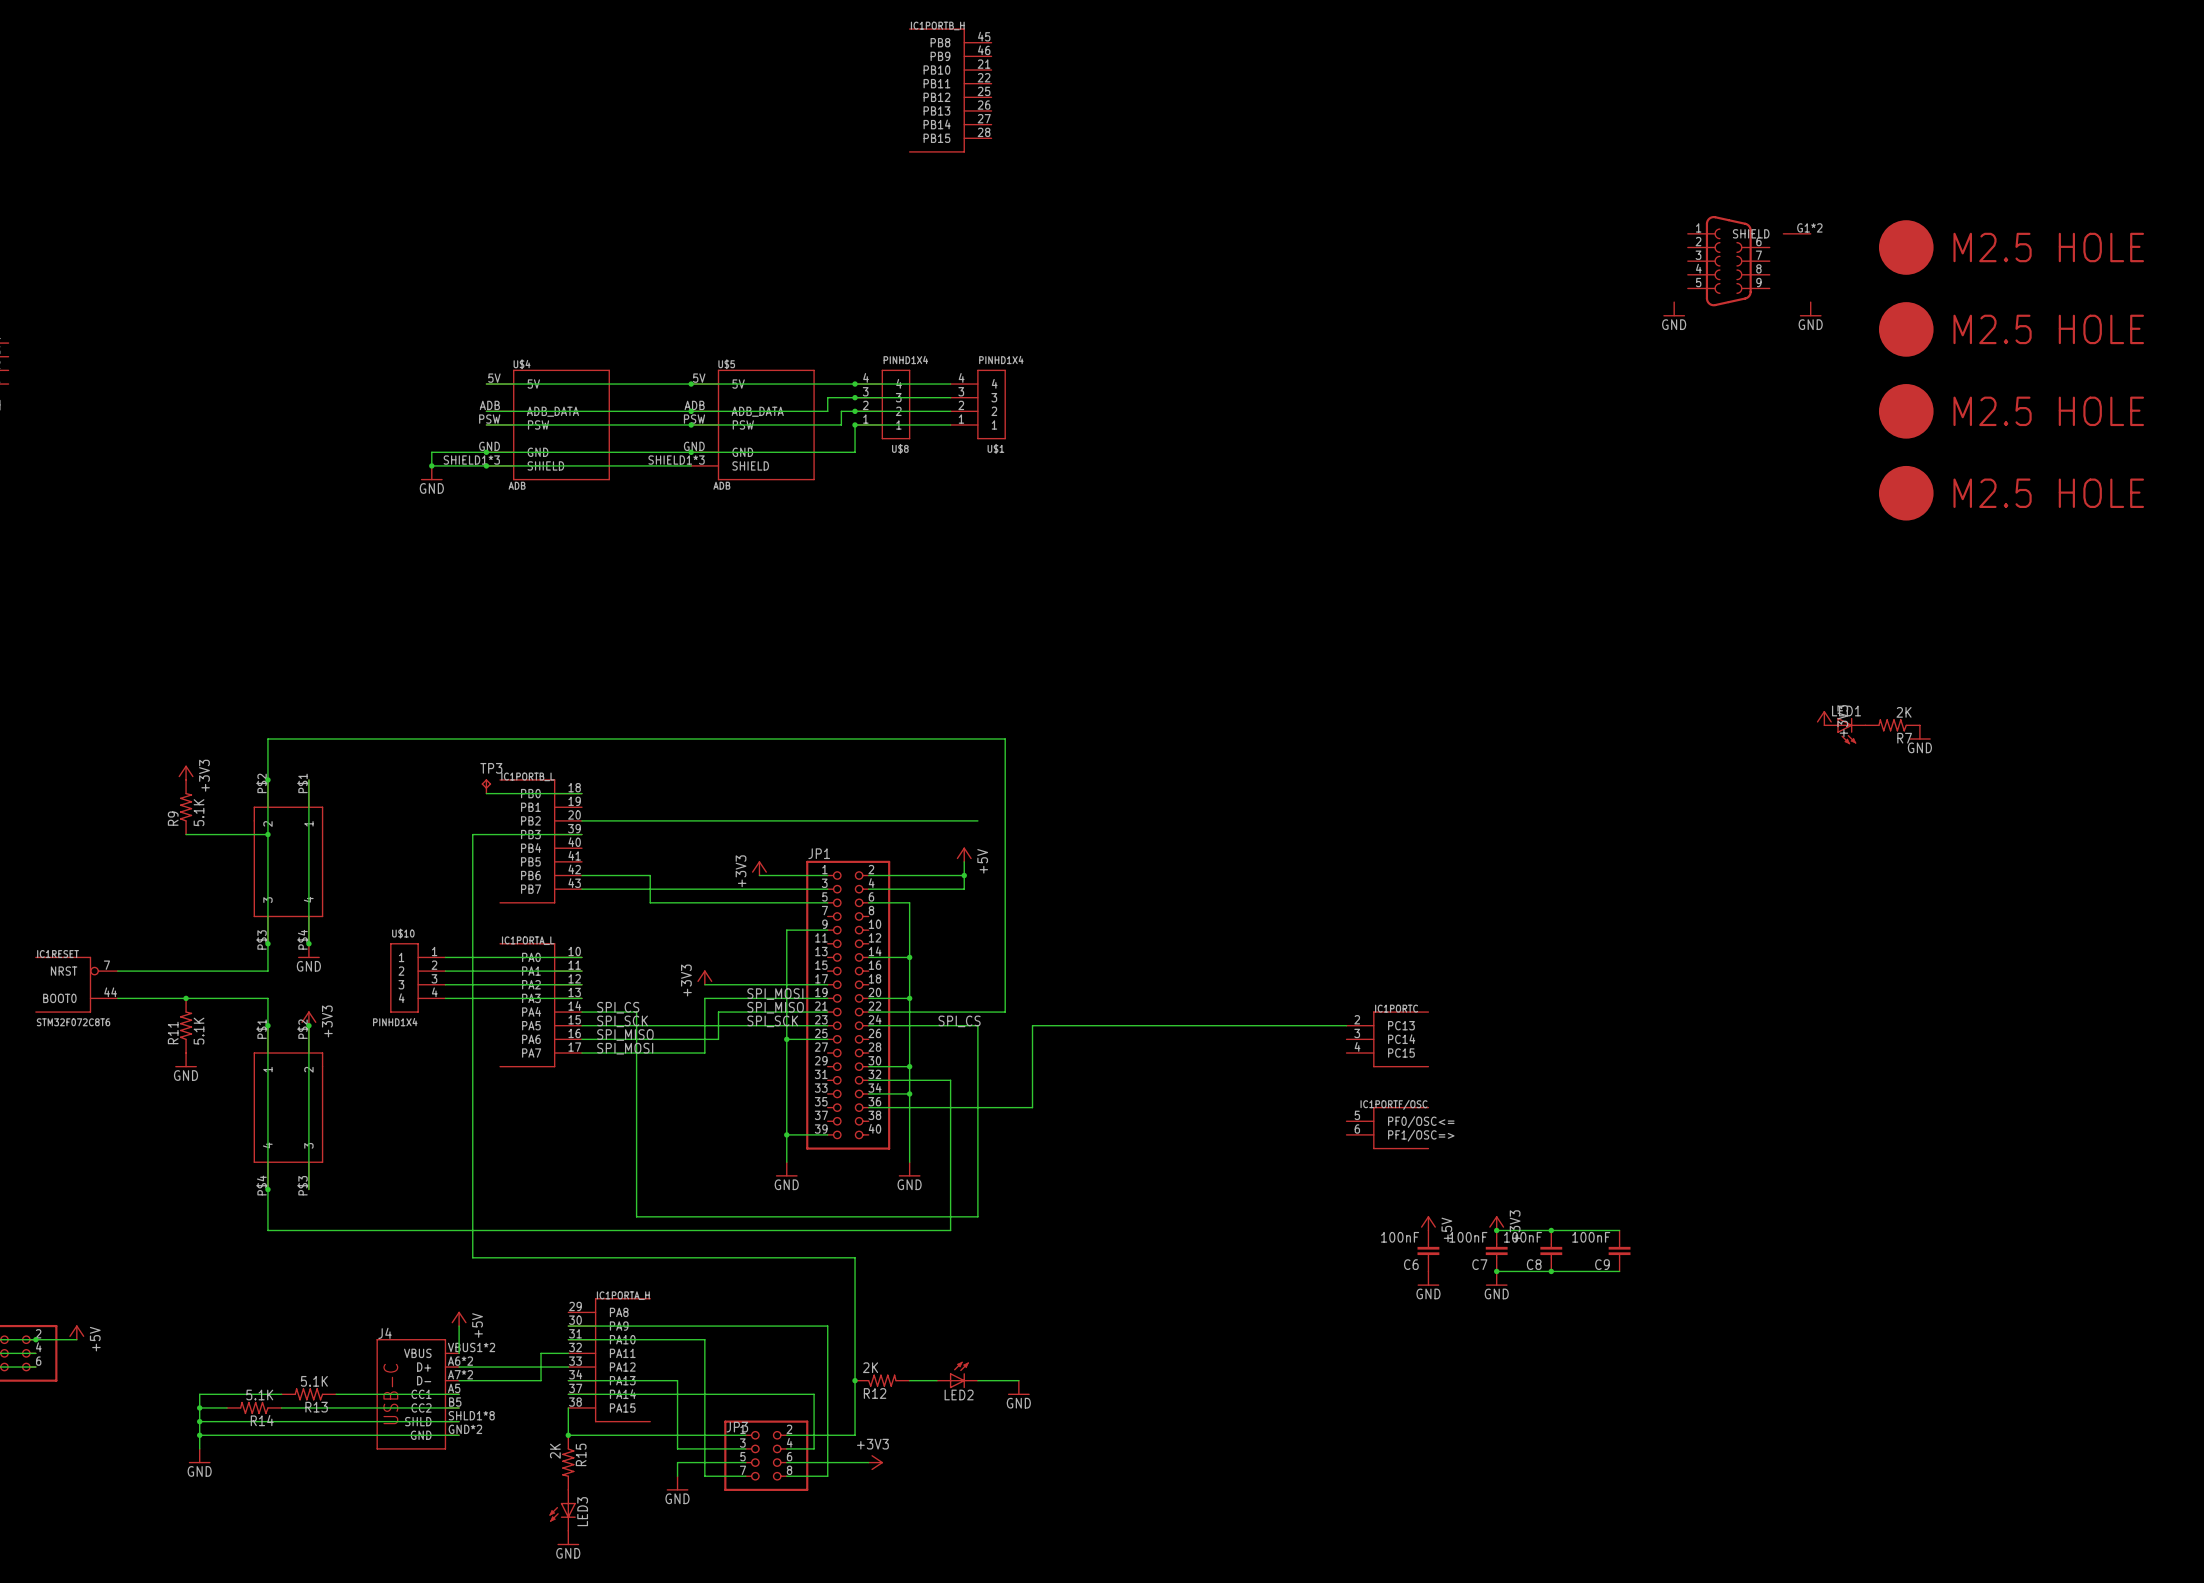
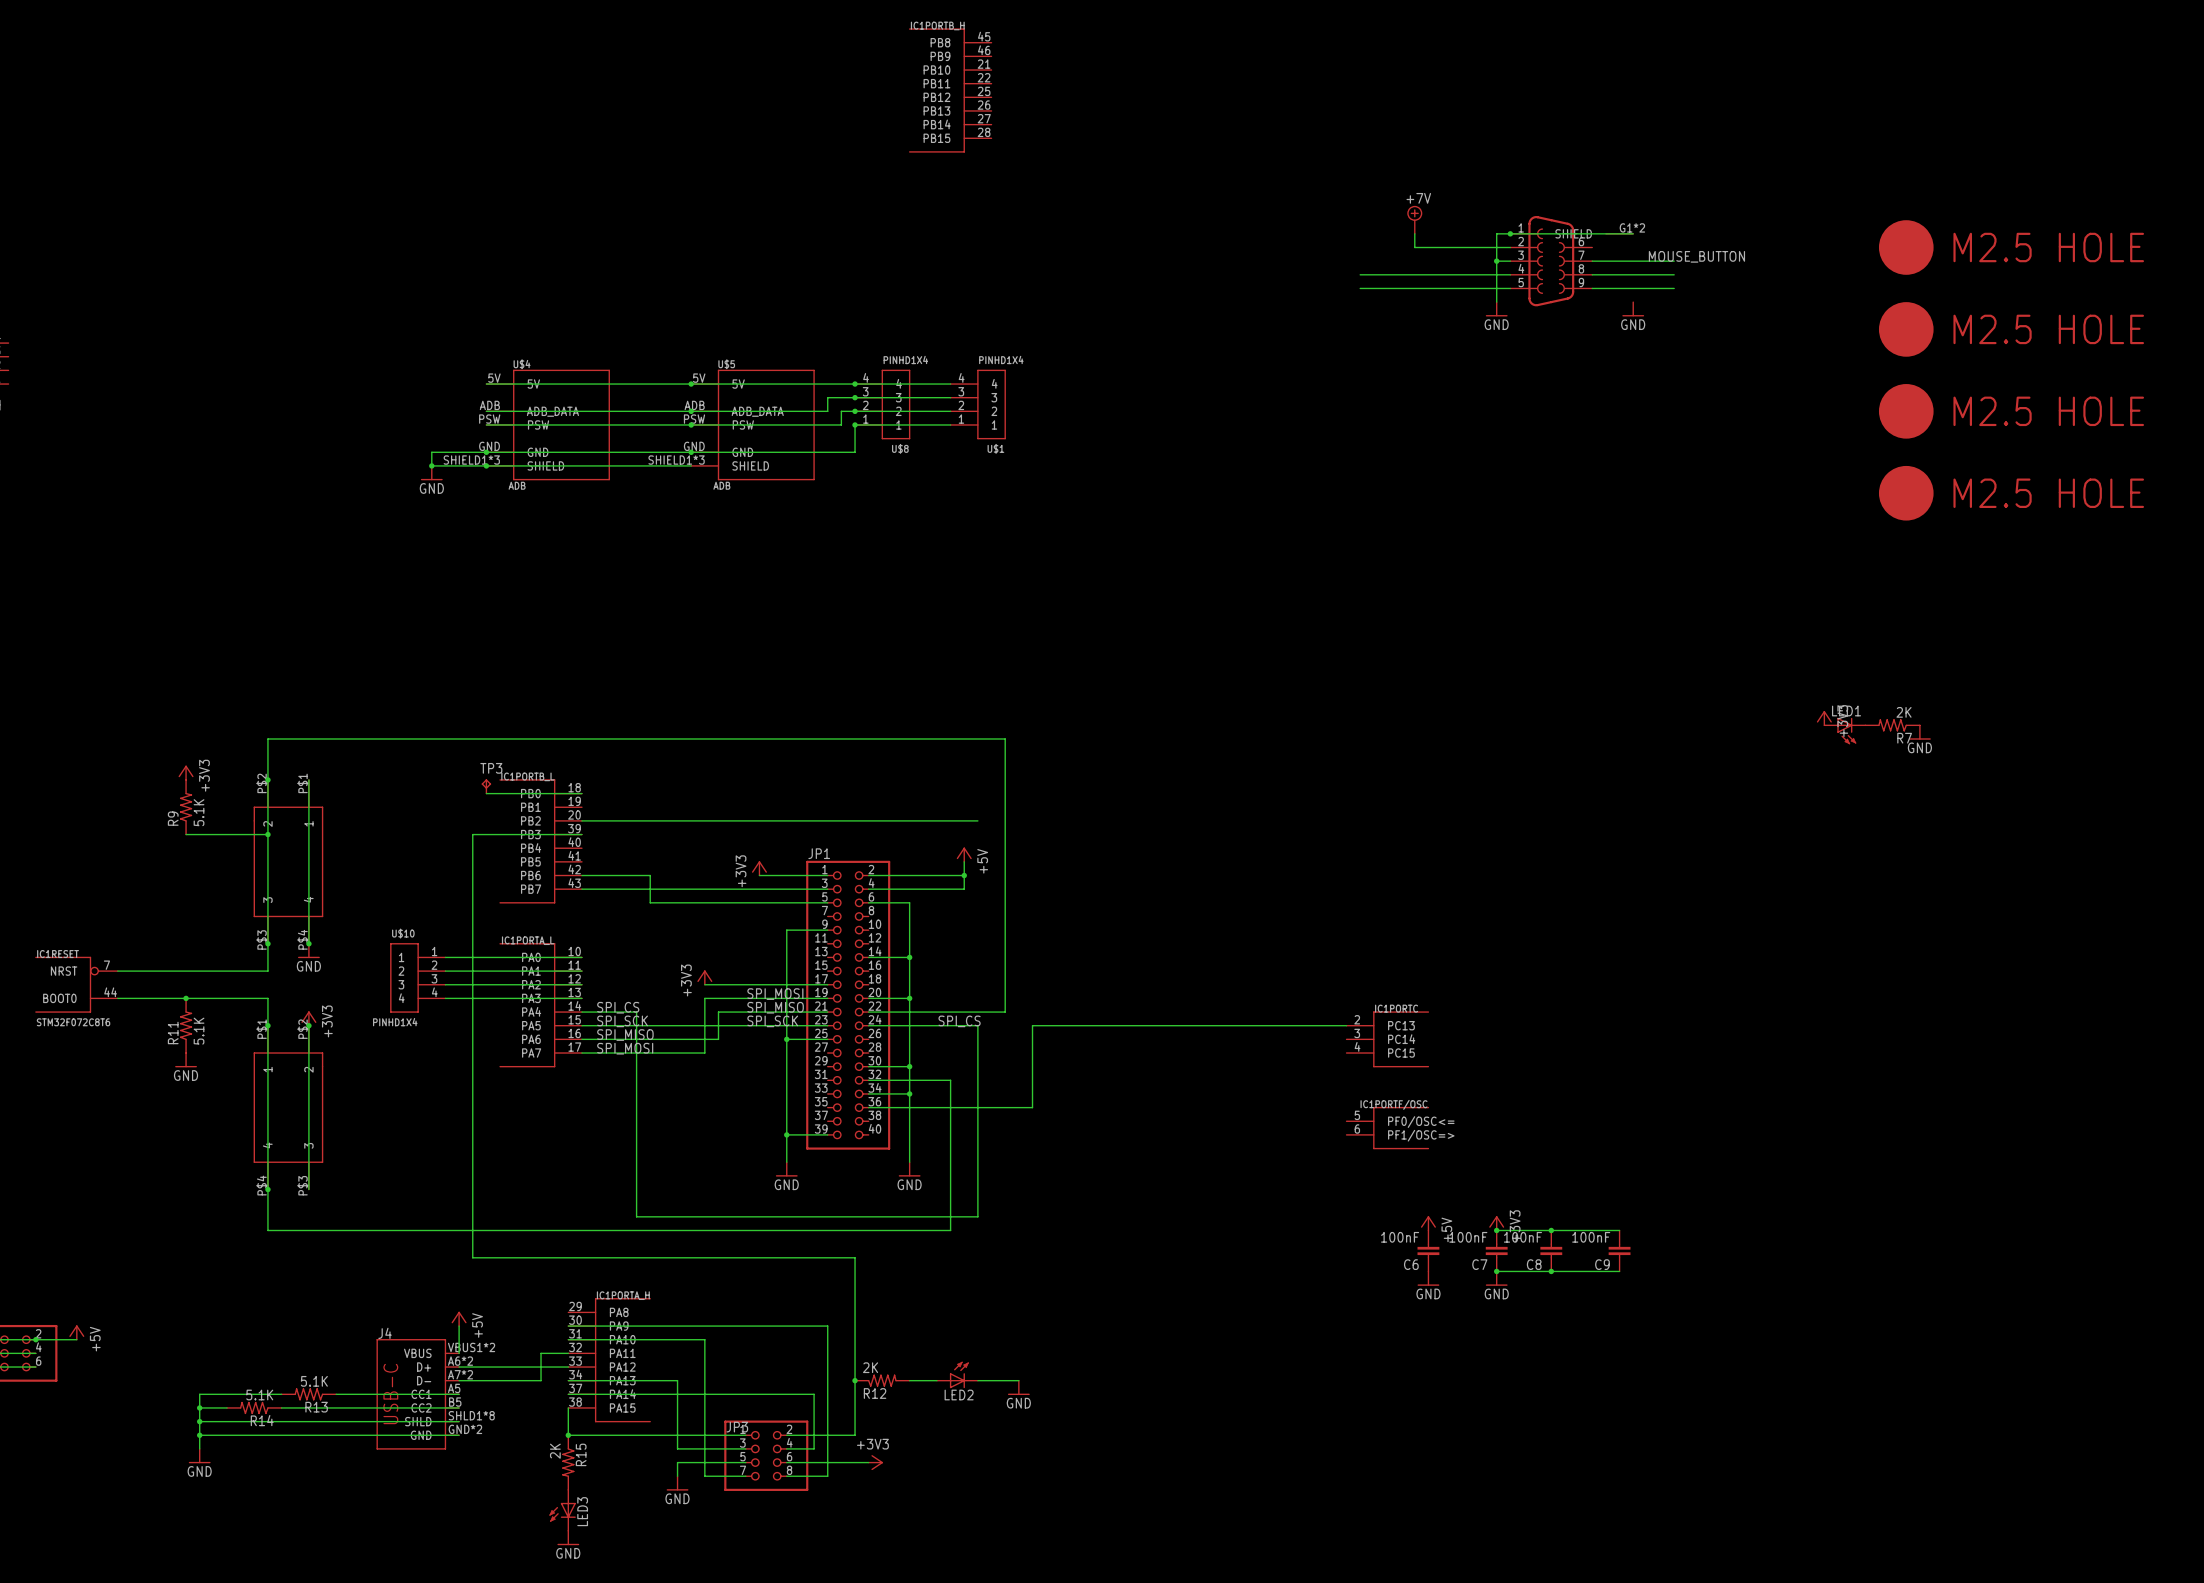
power symbol: none -> +7V (1414, 219)
wire: none -> (1414, 233) (1414, 247) (1510, 247)
junction: none -> (1510, 233)
wire: none -> (1633, 233) (1496, 233) (1496, 302)
label: none -> MOUSE_BUTTON (1696, 256)
wire: none -> (1496, 261) (1510, 261)
junction: none -> (1496, 261)
part: none -> (1571, 261)
wire: none -> (1592, 261) (1674, 261)
part: (1749, 261) -> none
wire: none -> (1360, 274) (1510, 274)
wire: none -> (1592, 274) (1674, 274)
wire: none -> (1360, 288) (1510, 288)
wire: none -> (1592, 288) (1674, 288)
power symbol: none -> GND (1496, 309)
power symbol position: GND (1674, 309) -> GND (1633, 309)
power symbol: GND (1810, 309) -> none

